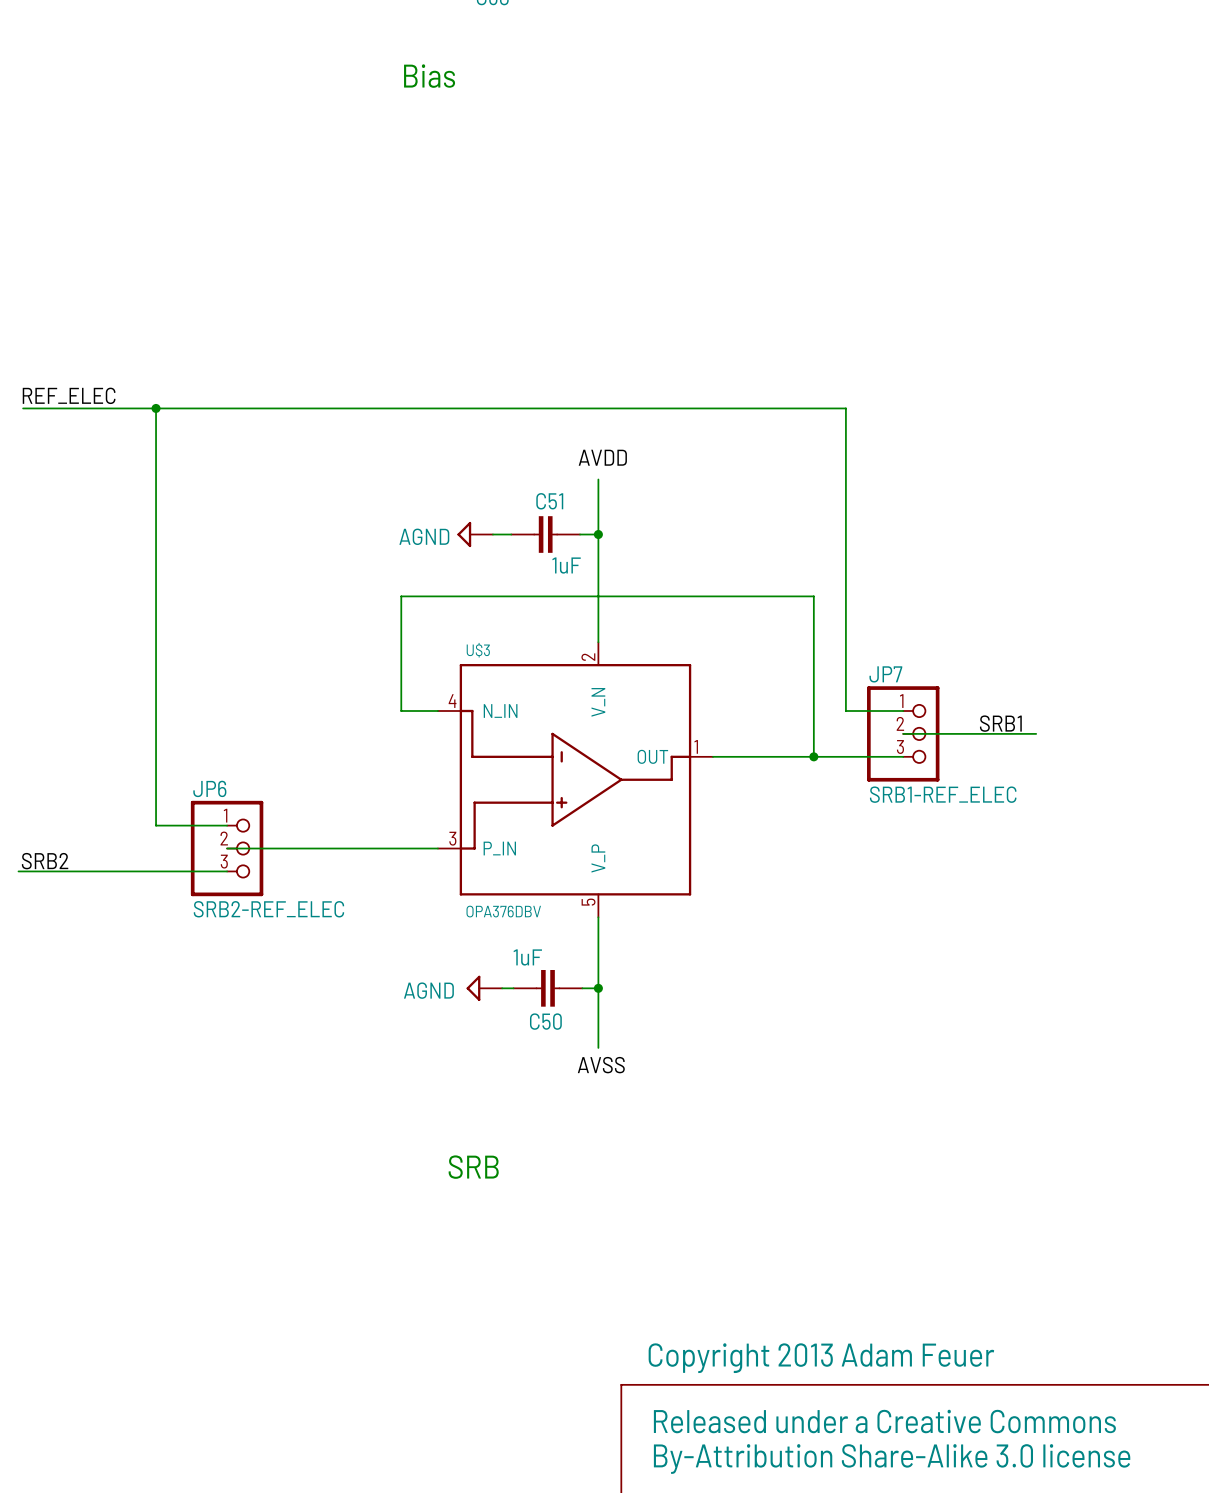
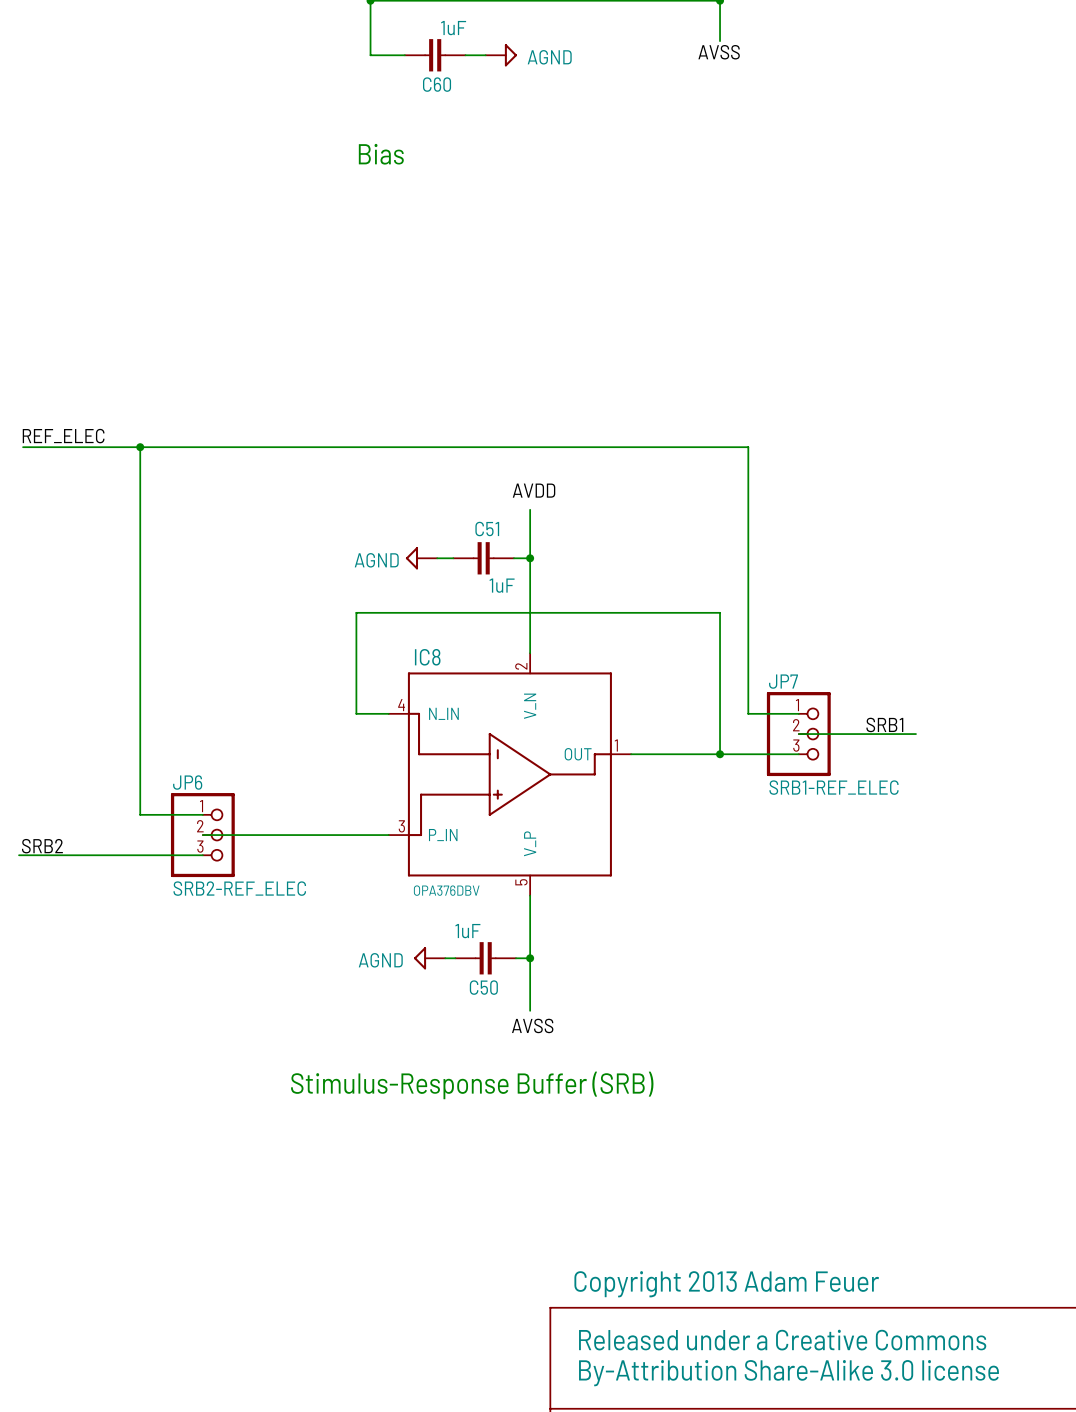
U$3 name: U$3 (478, 650) -> IC8 (427, 657)
text: none -> Stimulus-Response Buffer (SRB) (472, 1085)
text: SRB (473, 1167) -> none

